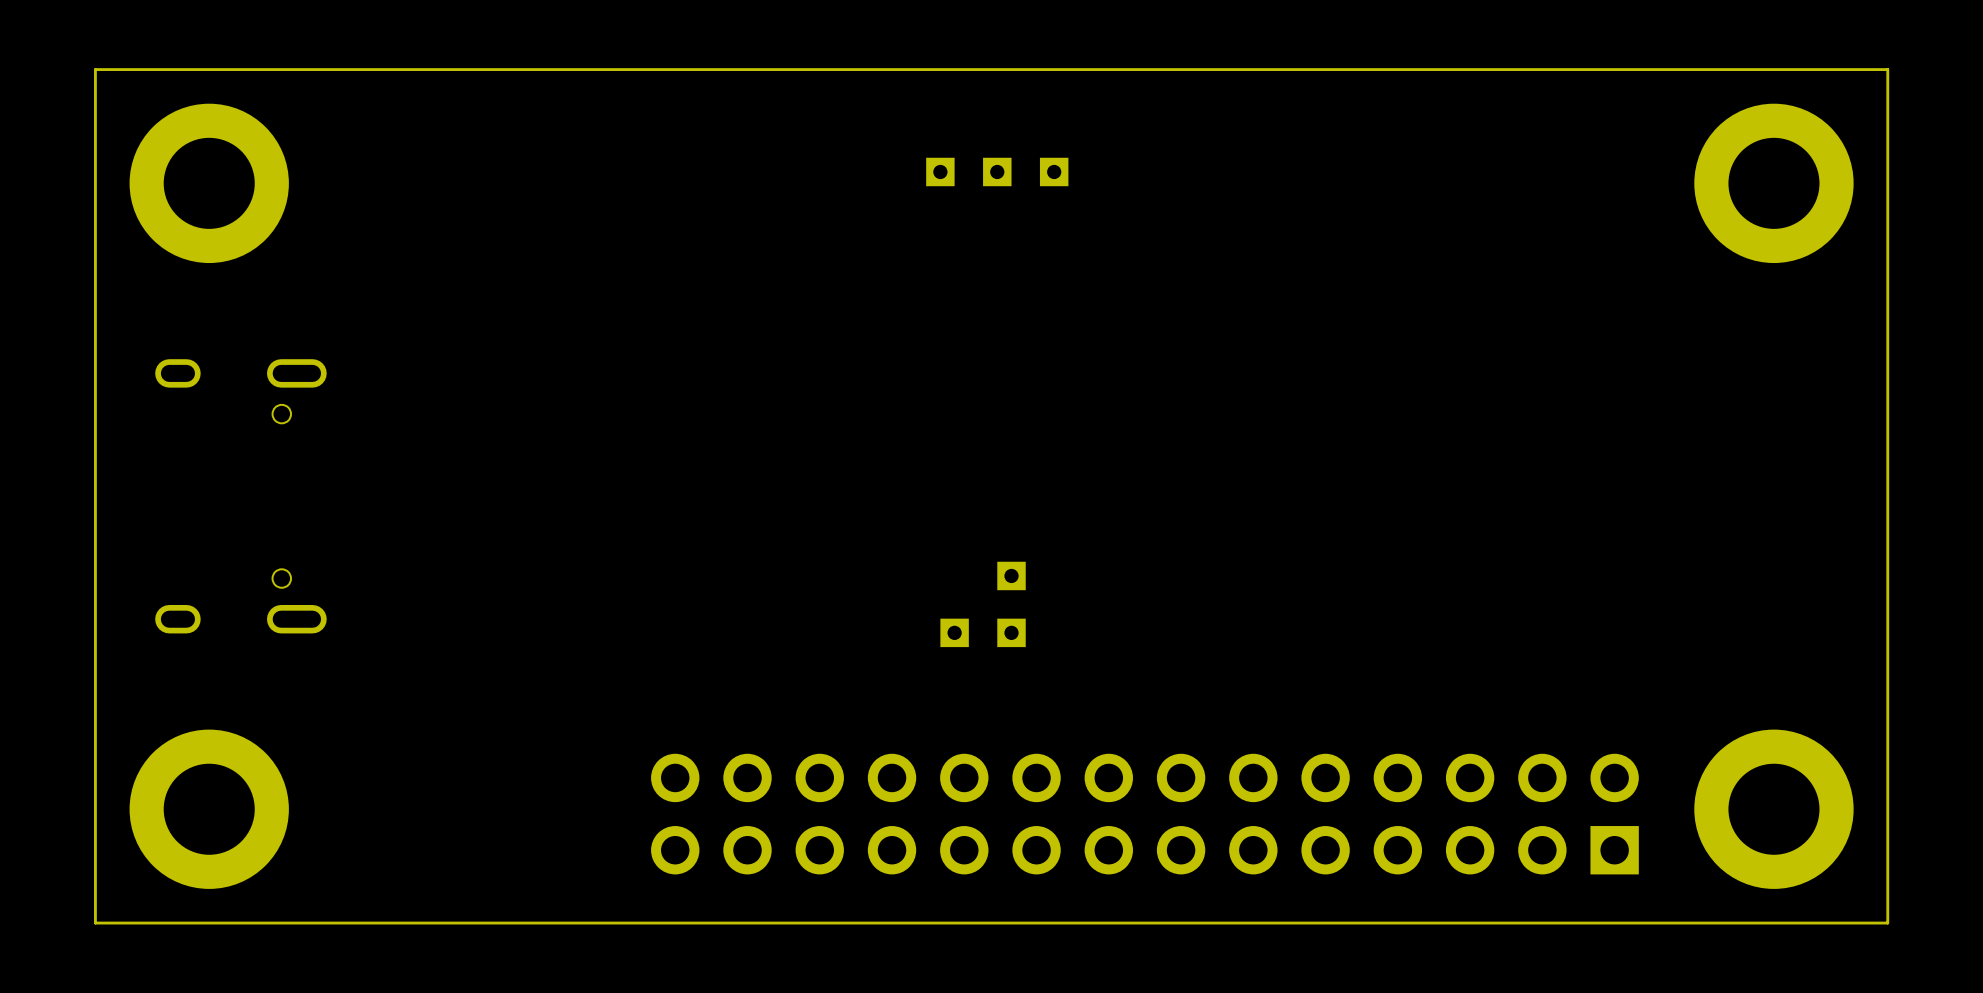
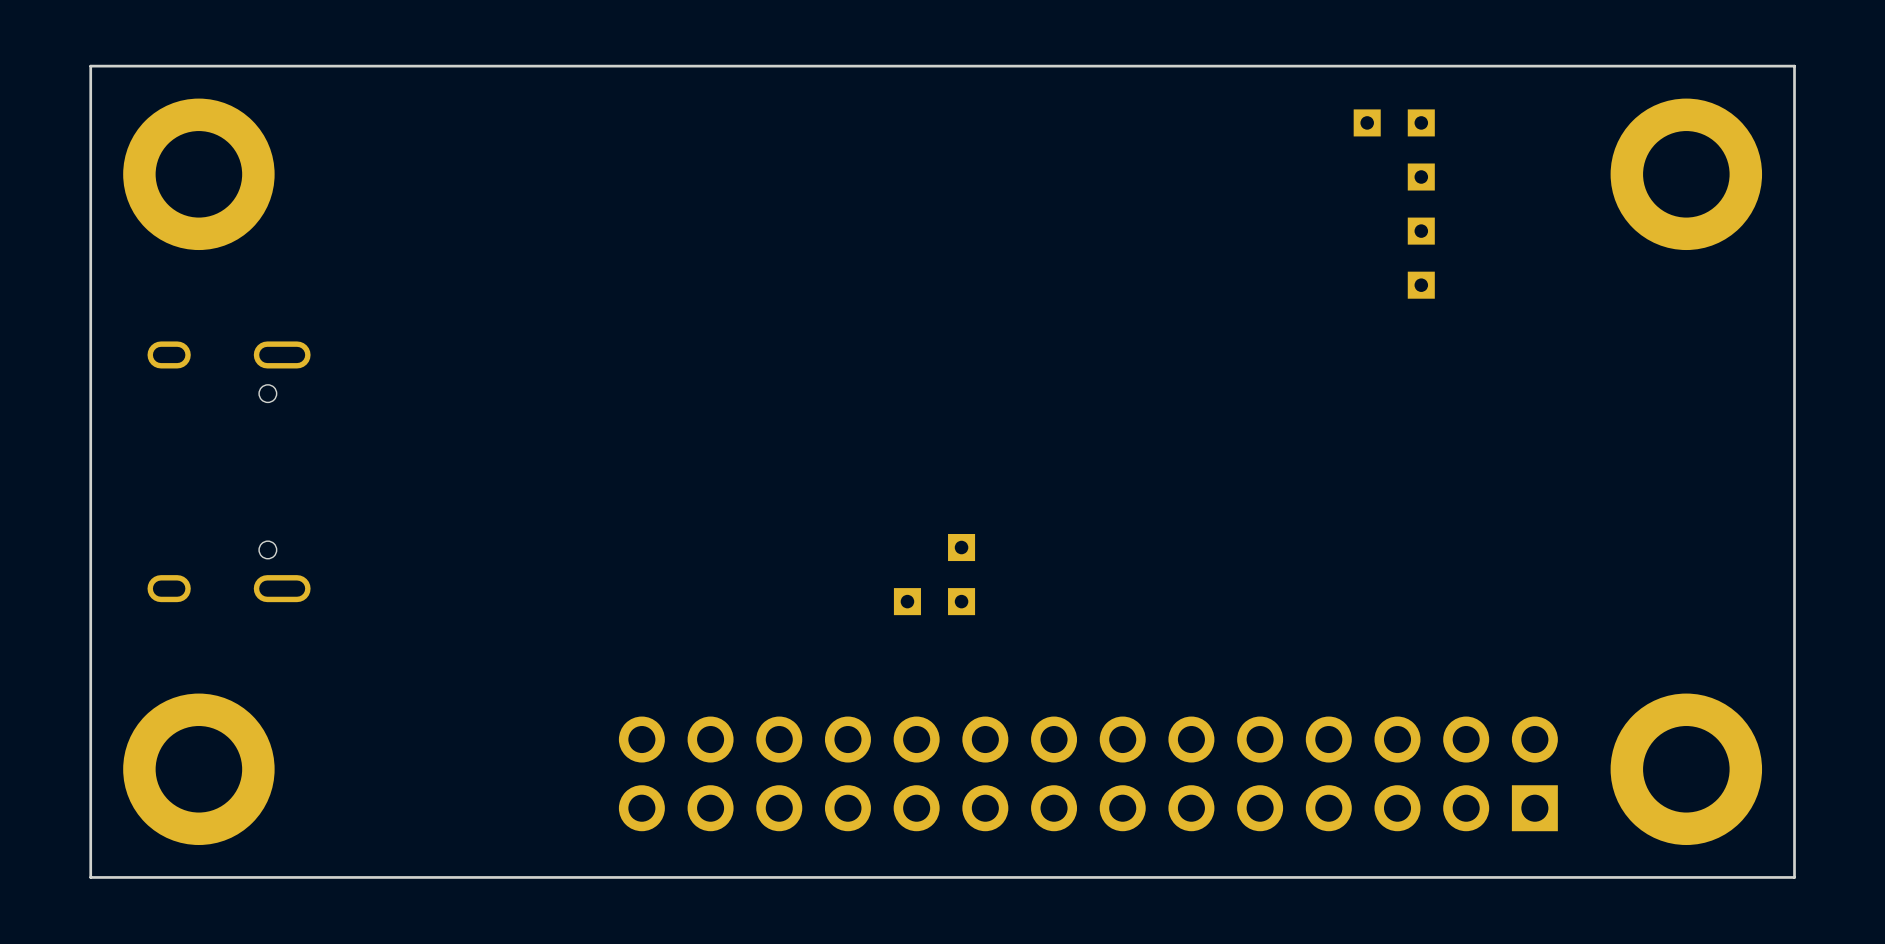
part: none -> (1367, 122)
part: none -> (1421, 122)
part: (940, 171) -> none
part: (997, 171) -> none
part: (1054, 171) -> none
part: none -> (1421, 177)
part: none -> (1421, 231)
part: none -> (1421, 285)

